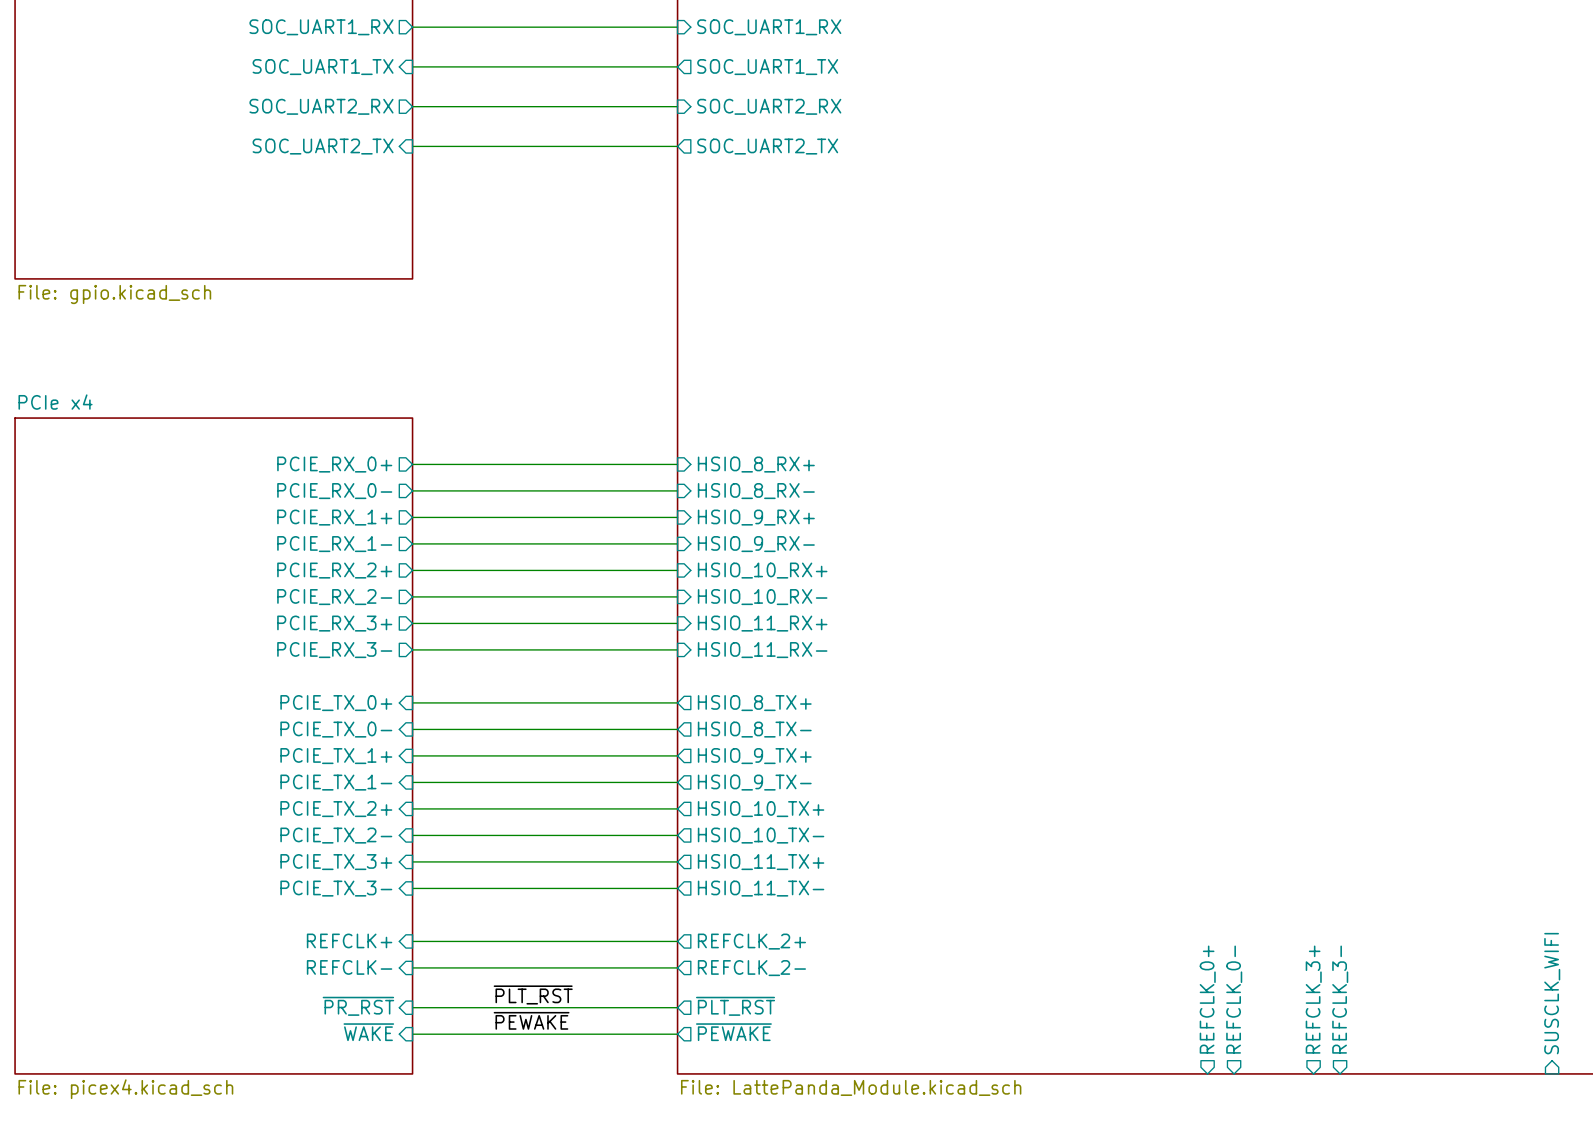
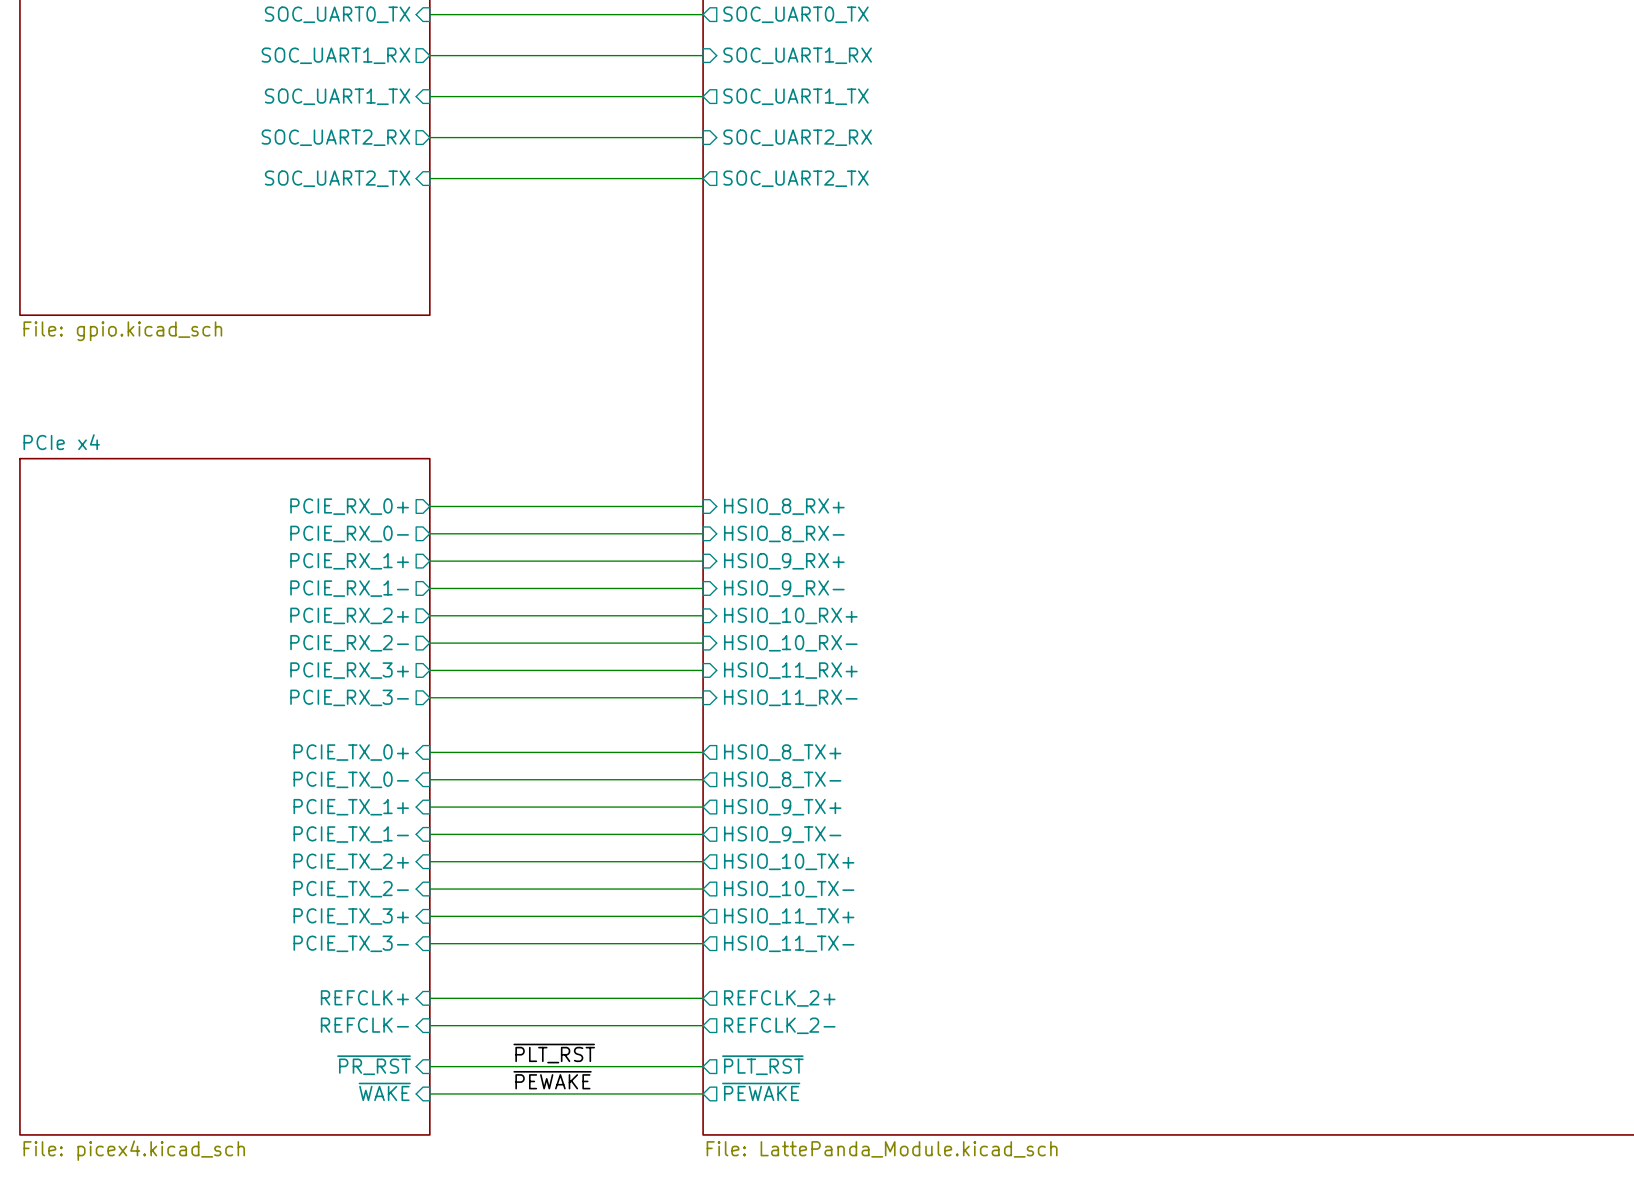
sheet pin: SUSCLK_WIFI (1552, 993) -> none
sheet pin: REFCLK_0+ (1207, 999) -> none
sheet pin: REFCLK_0- (1234, 999) -> none
sheet pin: REFCLK_3+ (1313, 999) -> none
sheet pin: REFCLK_3- (1340, 999) -> none

